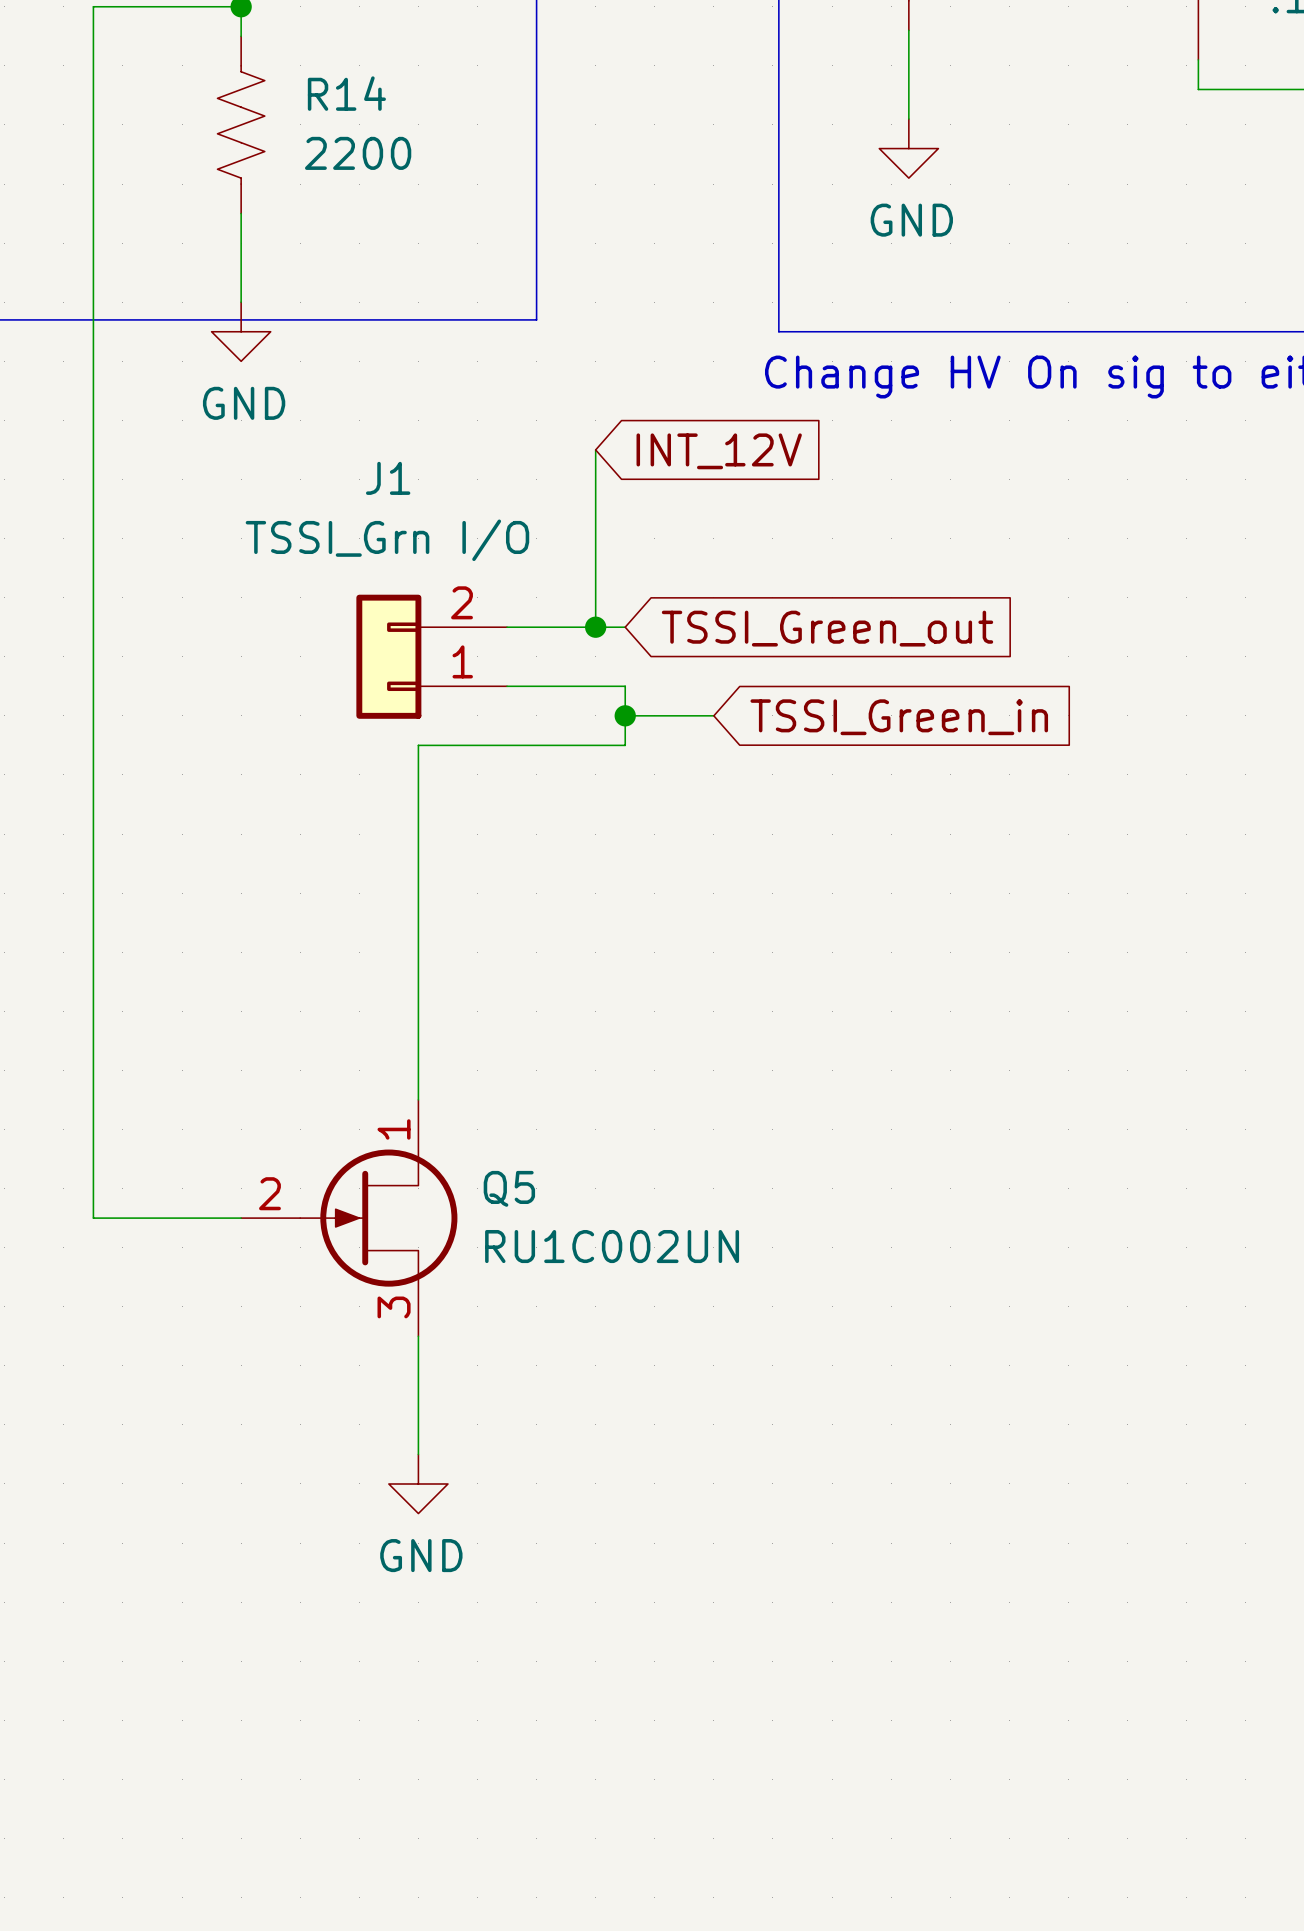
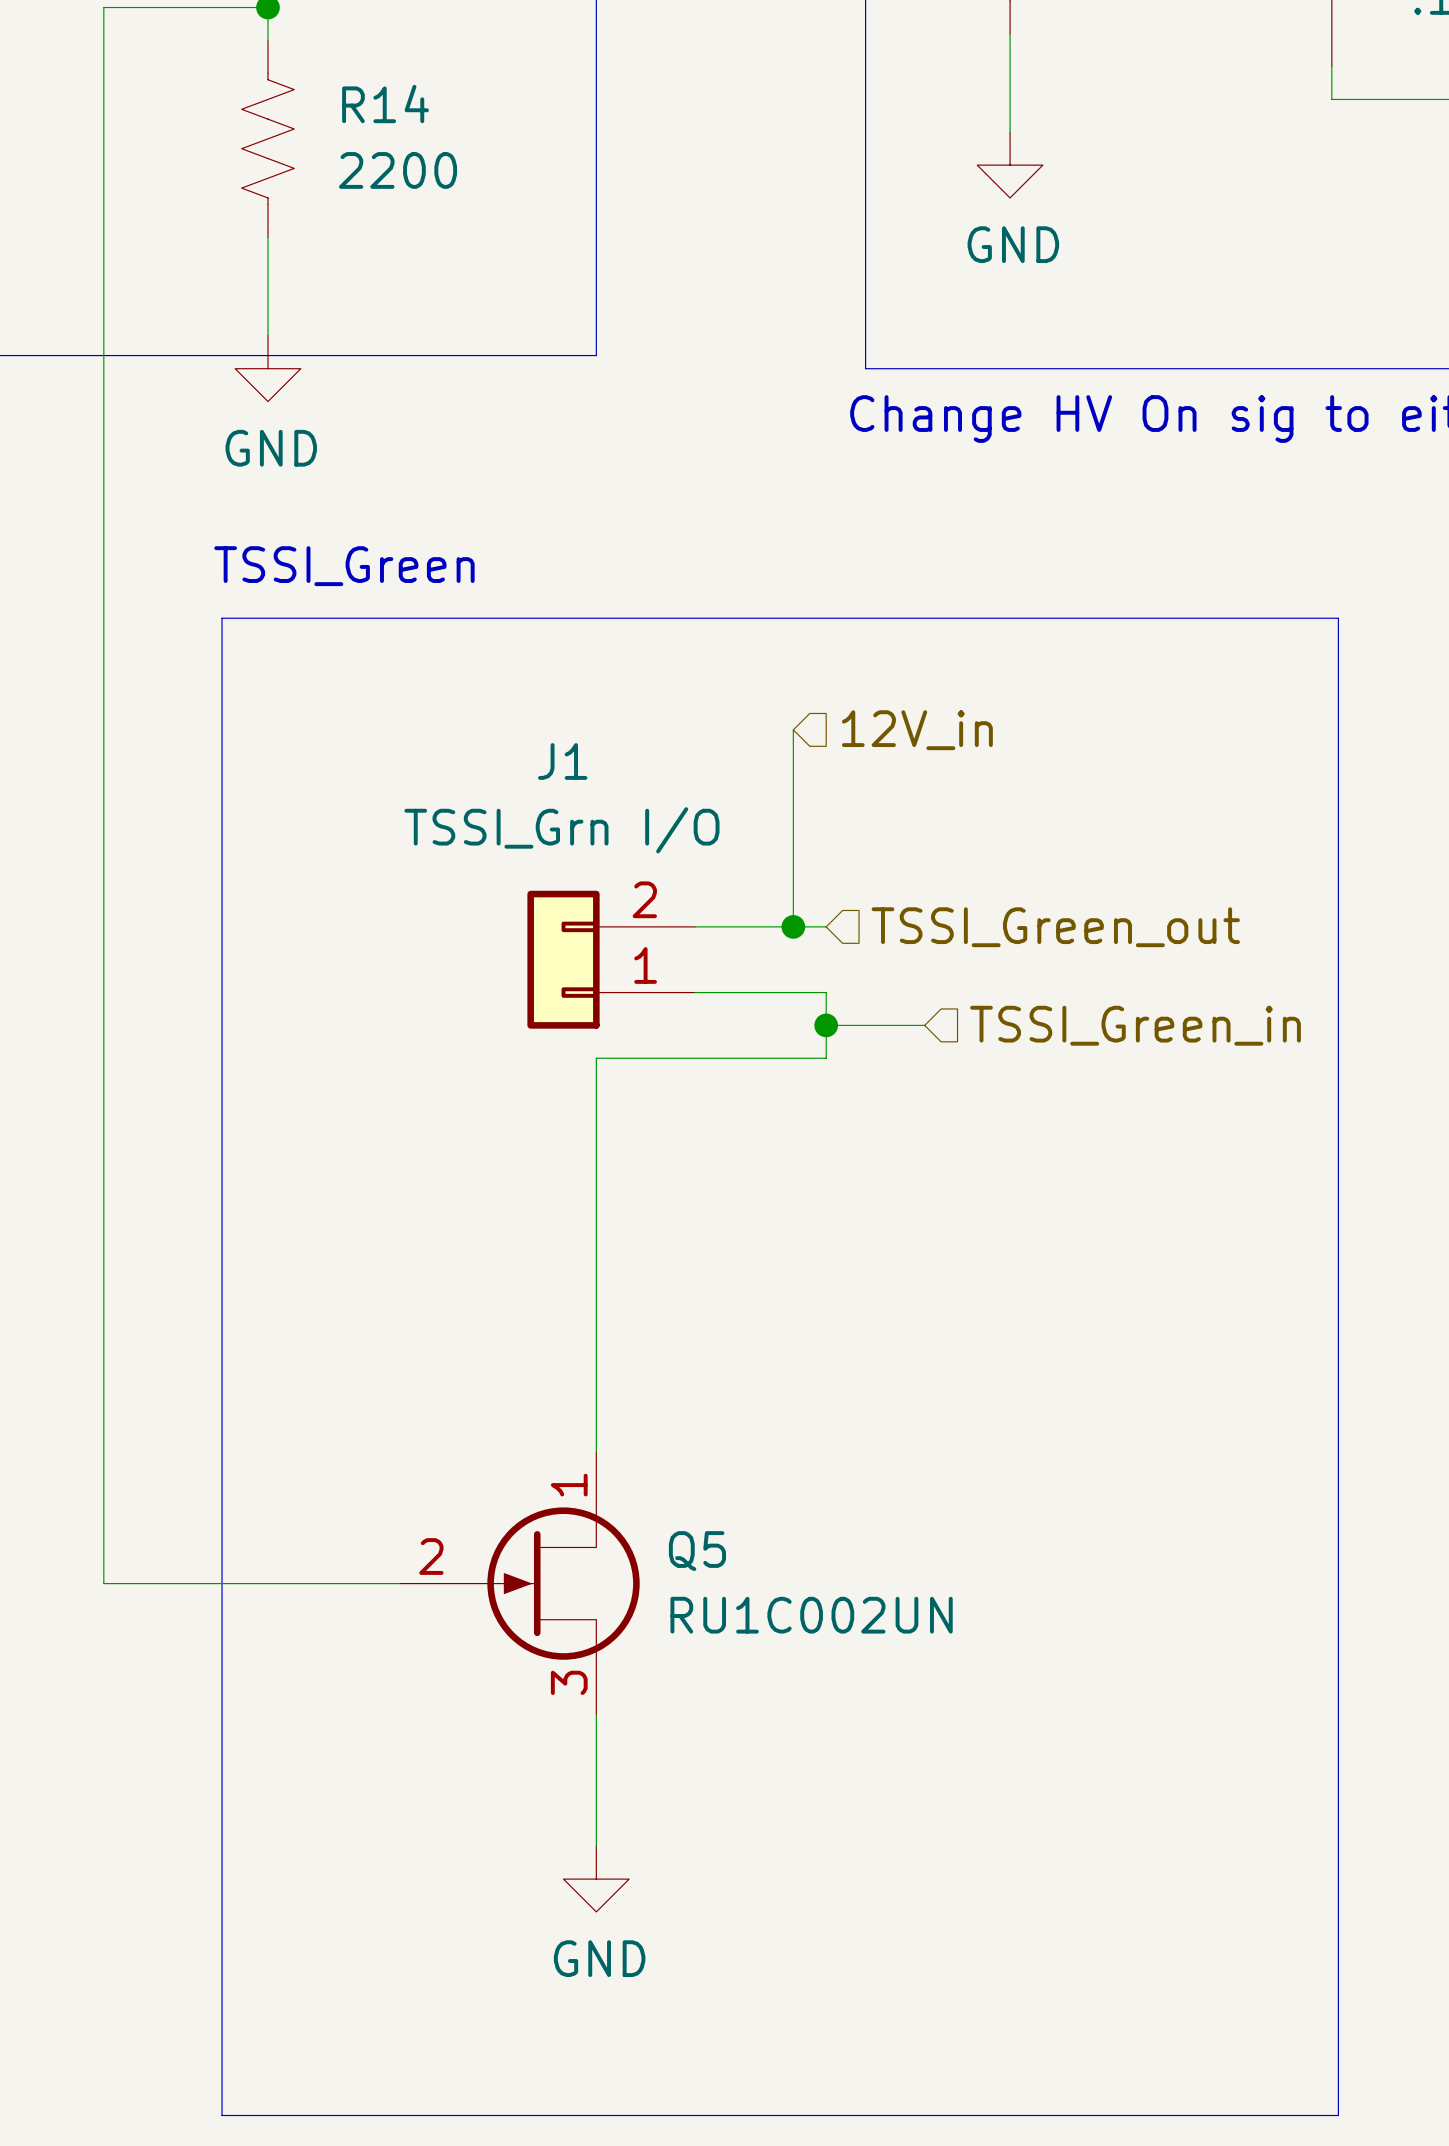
wire: (595, 449) (595, 627) -> (793, 729) (793, 926)
global label: INT_12V (719, 451) -> none
text: none -> TSSI_Green (344, 566)
line: none -> (222, 618) (1338, 618) (1338, 2115) (222, 2115) (222, 618)
wire: (507, 627) (625, 627) -> (694, 926) (826, 926)
junction: (595, 627) -> none
global label: TSSI_Green_out (827, 628) -> none
J1 position: (431, 656) -> (611, 959)
hierarchical label: none -> 12V_in (917, 730)
wire: (507, 686) (625, 686) (625, 745) (418, 745) (418, 1099) -> (694, 992) (826, 992) (826, 1058) (596, 1058) (596, 1452)
wire: (625, 715) (713, 715) -> (826, 1025) (924, 1025)
junction: (625, 715) -> none
global label: TSSI_Green_in (899, 717) -> none
junction: none -> (793, 926)
hierarchical label: none -> TSSI_Green_out (1055, 927)
junction: none -> (826, 1025)
hierarchical label: none -> TSSI_Green_in (1135, 1025)
wire: (93, 1218) (241, 1218) -> (103, 1353) (103, 1583) (399, 1583)
Q5 position: (349, 1218) -> (519, 1583)
wire: (418, 1336) (418, 1454) -> (596, 1714) (596, 1846)
power symbol position: GND (418, 1483) -> GND (596, 1879)

